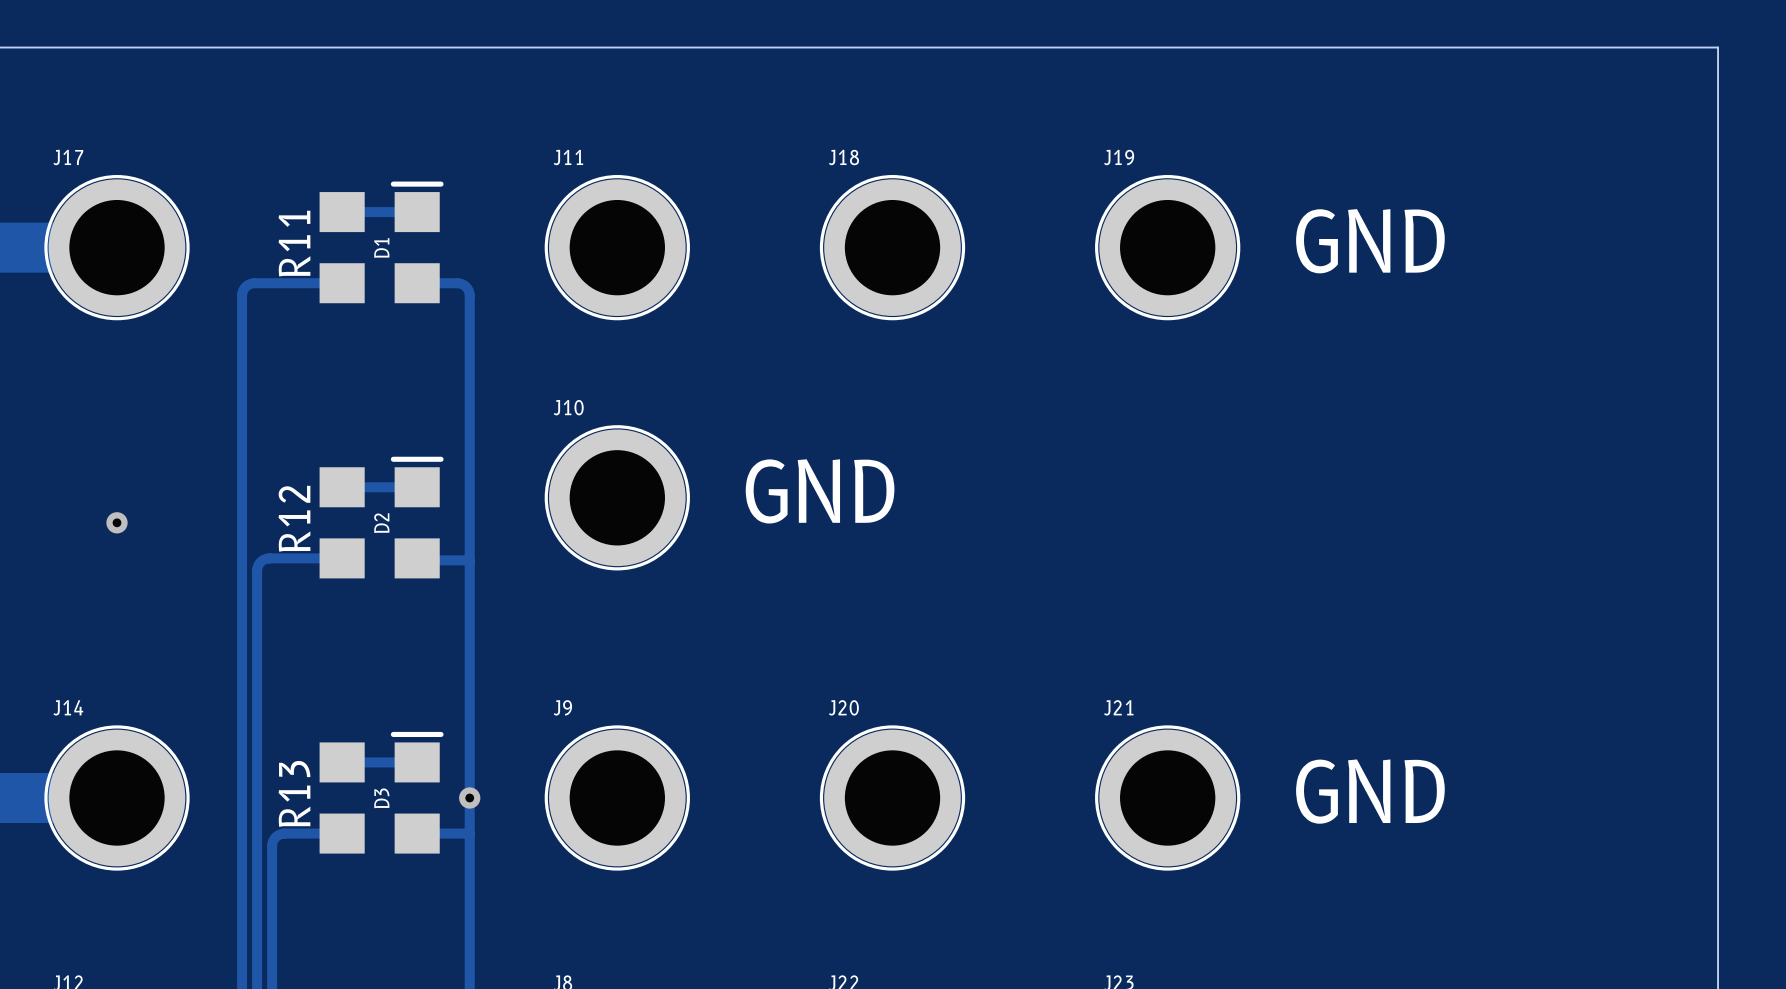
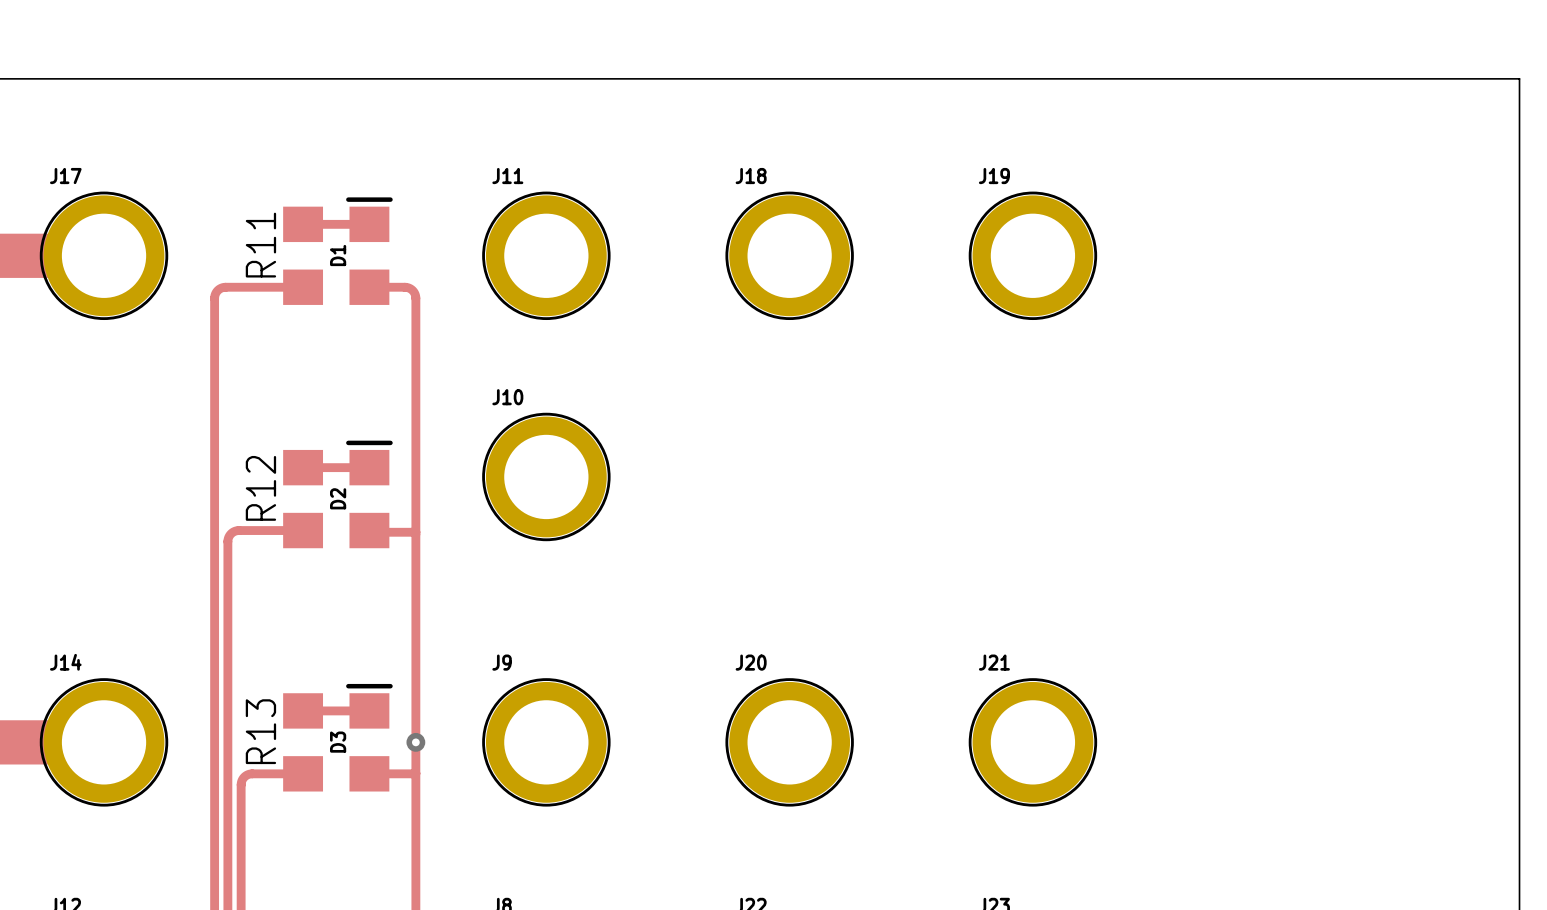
text: GND (1370, 241) -> none
text: GND (820, 491) -> none
via: (117, 522) -> none
text: GND (1370, 791) -> none

